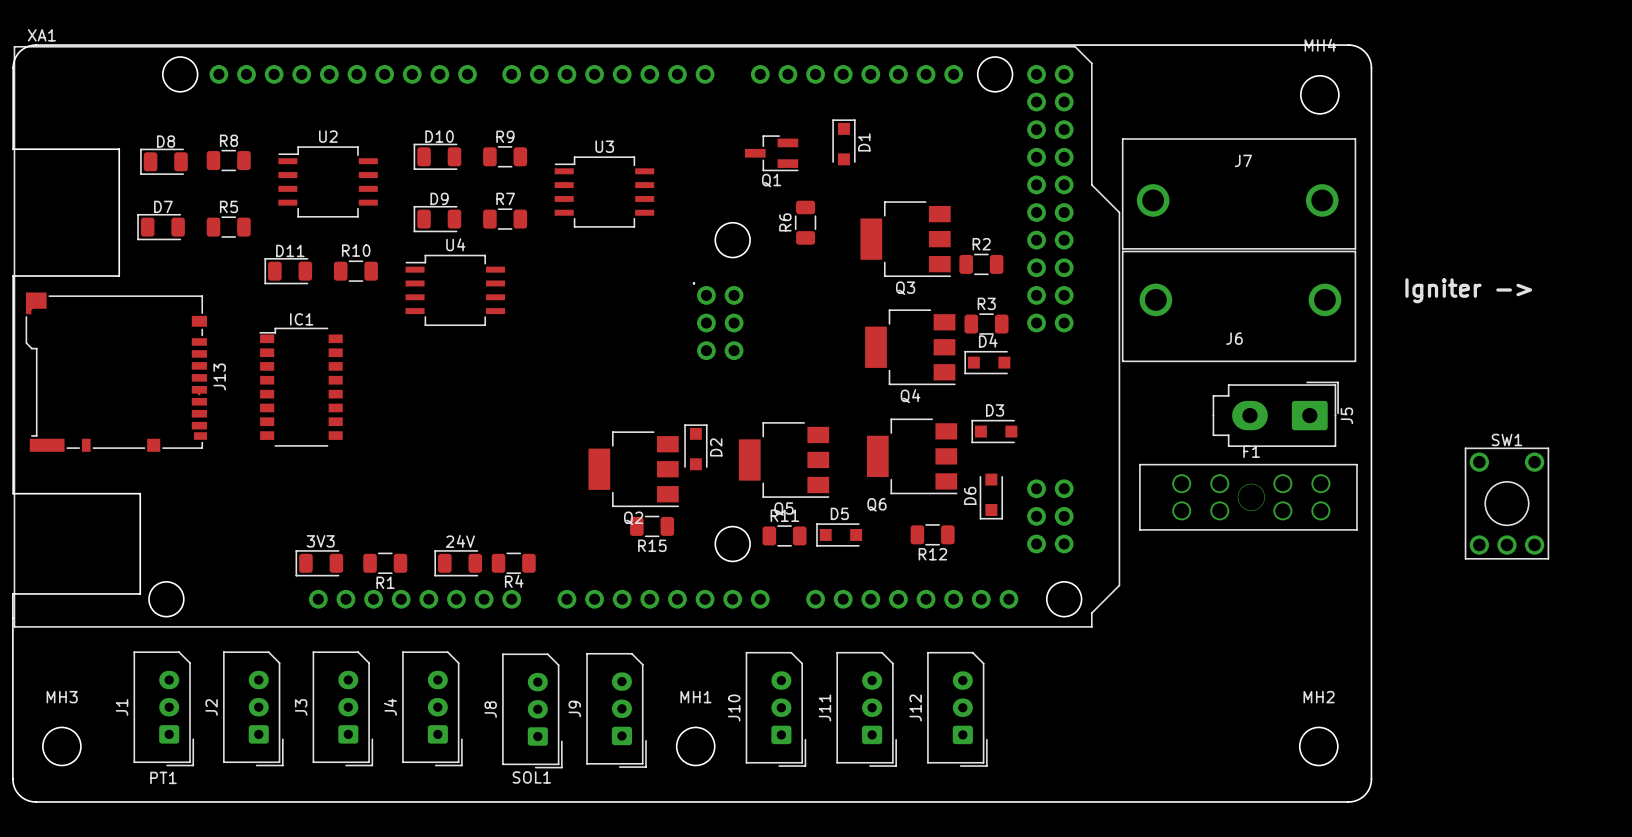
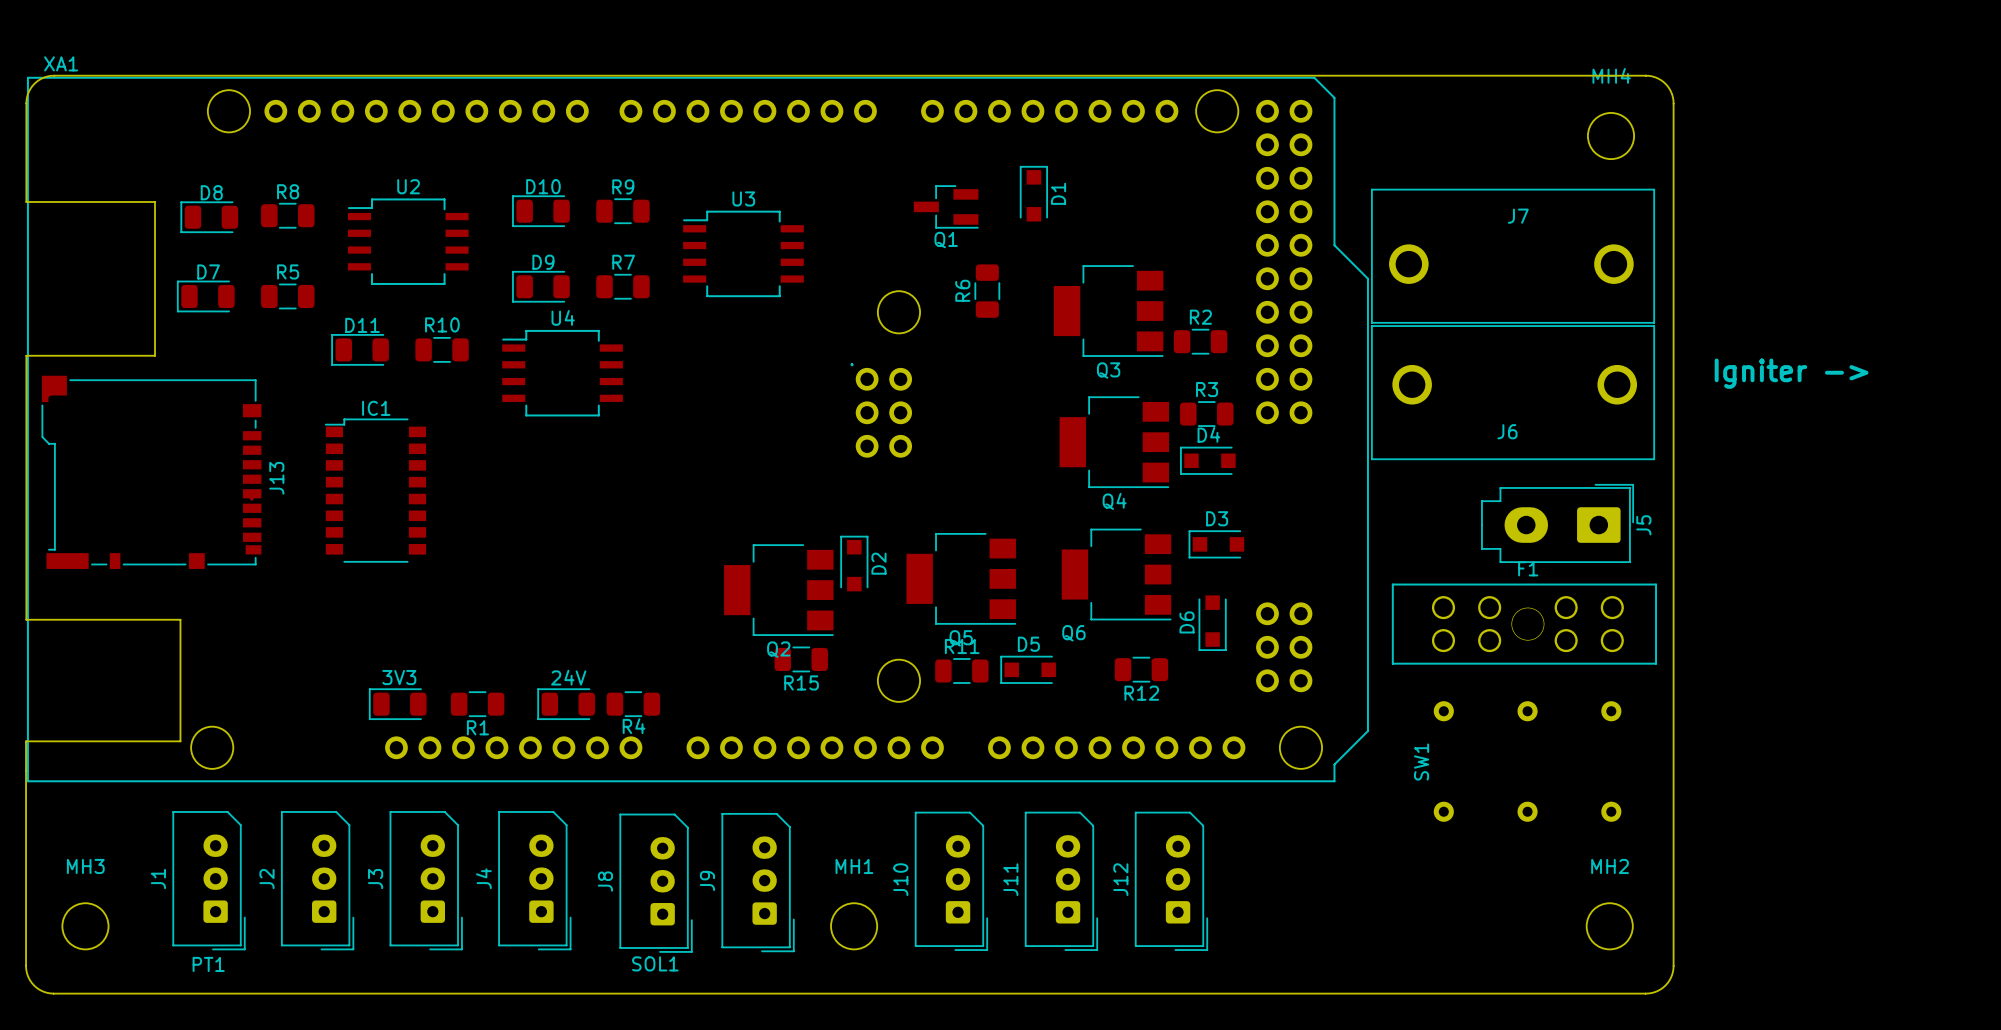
SW1 name position: SW1 (1506, 439) -> SW1 (1421, 762)
SW1 footprint: [1464, 447, 1550, 560] -> [1433, 701, 1622, 822]

